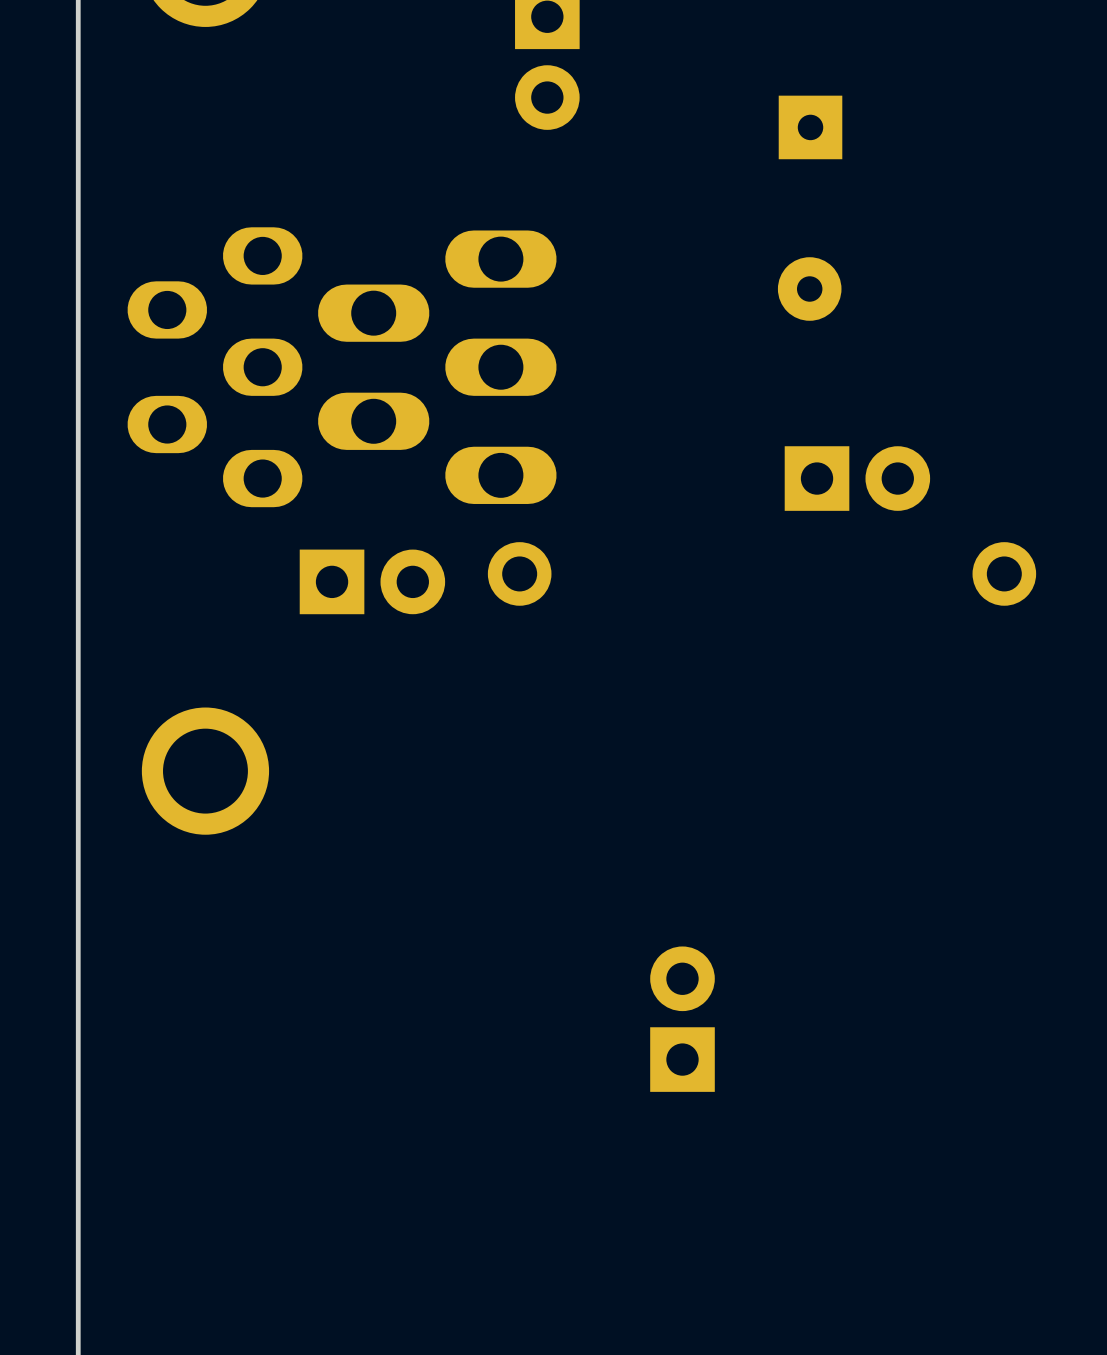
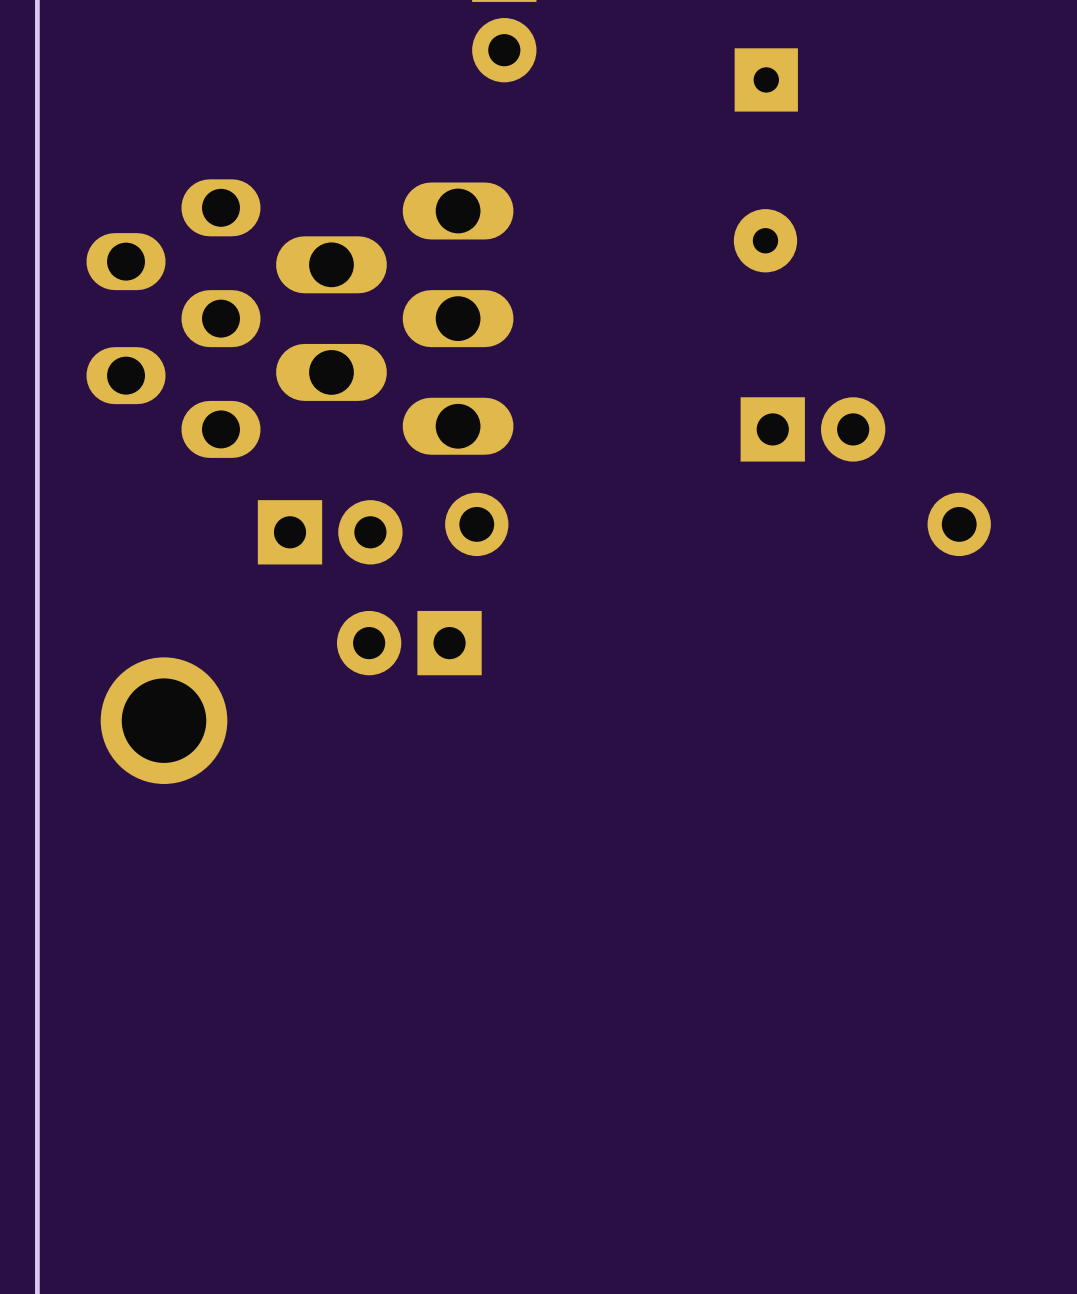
part rotation: 0° (682, 1019) -> 90° counterclockwise (409, 643)
part position: (682, 1019) -> (409, 643)

